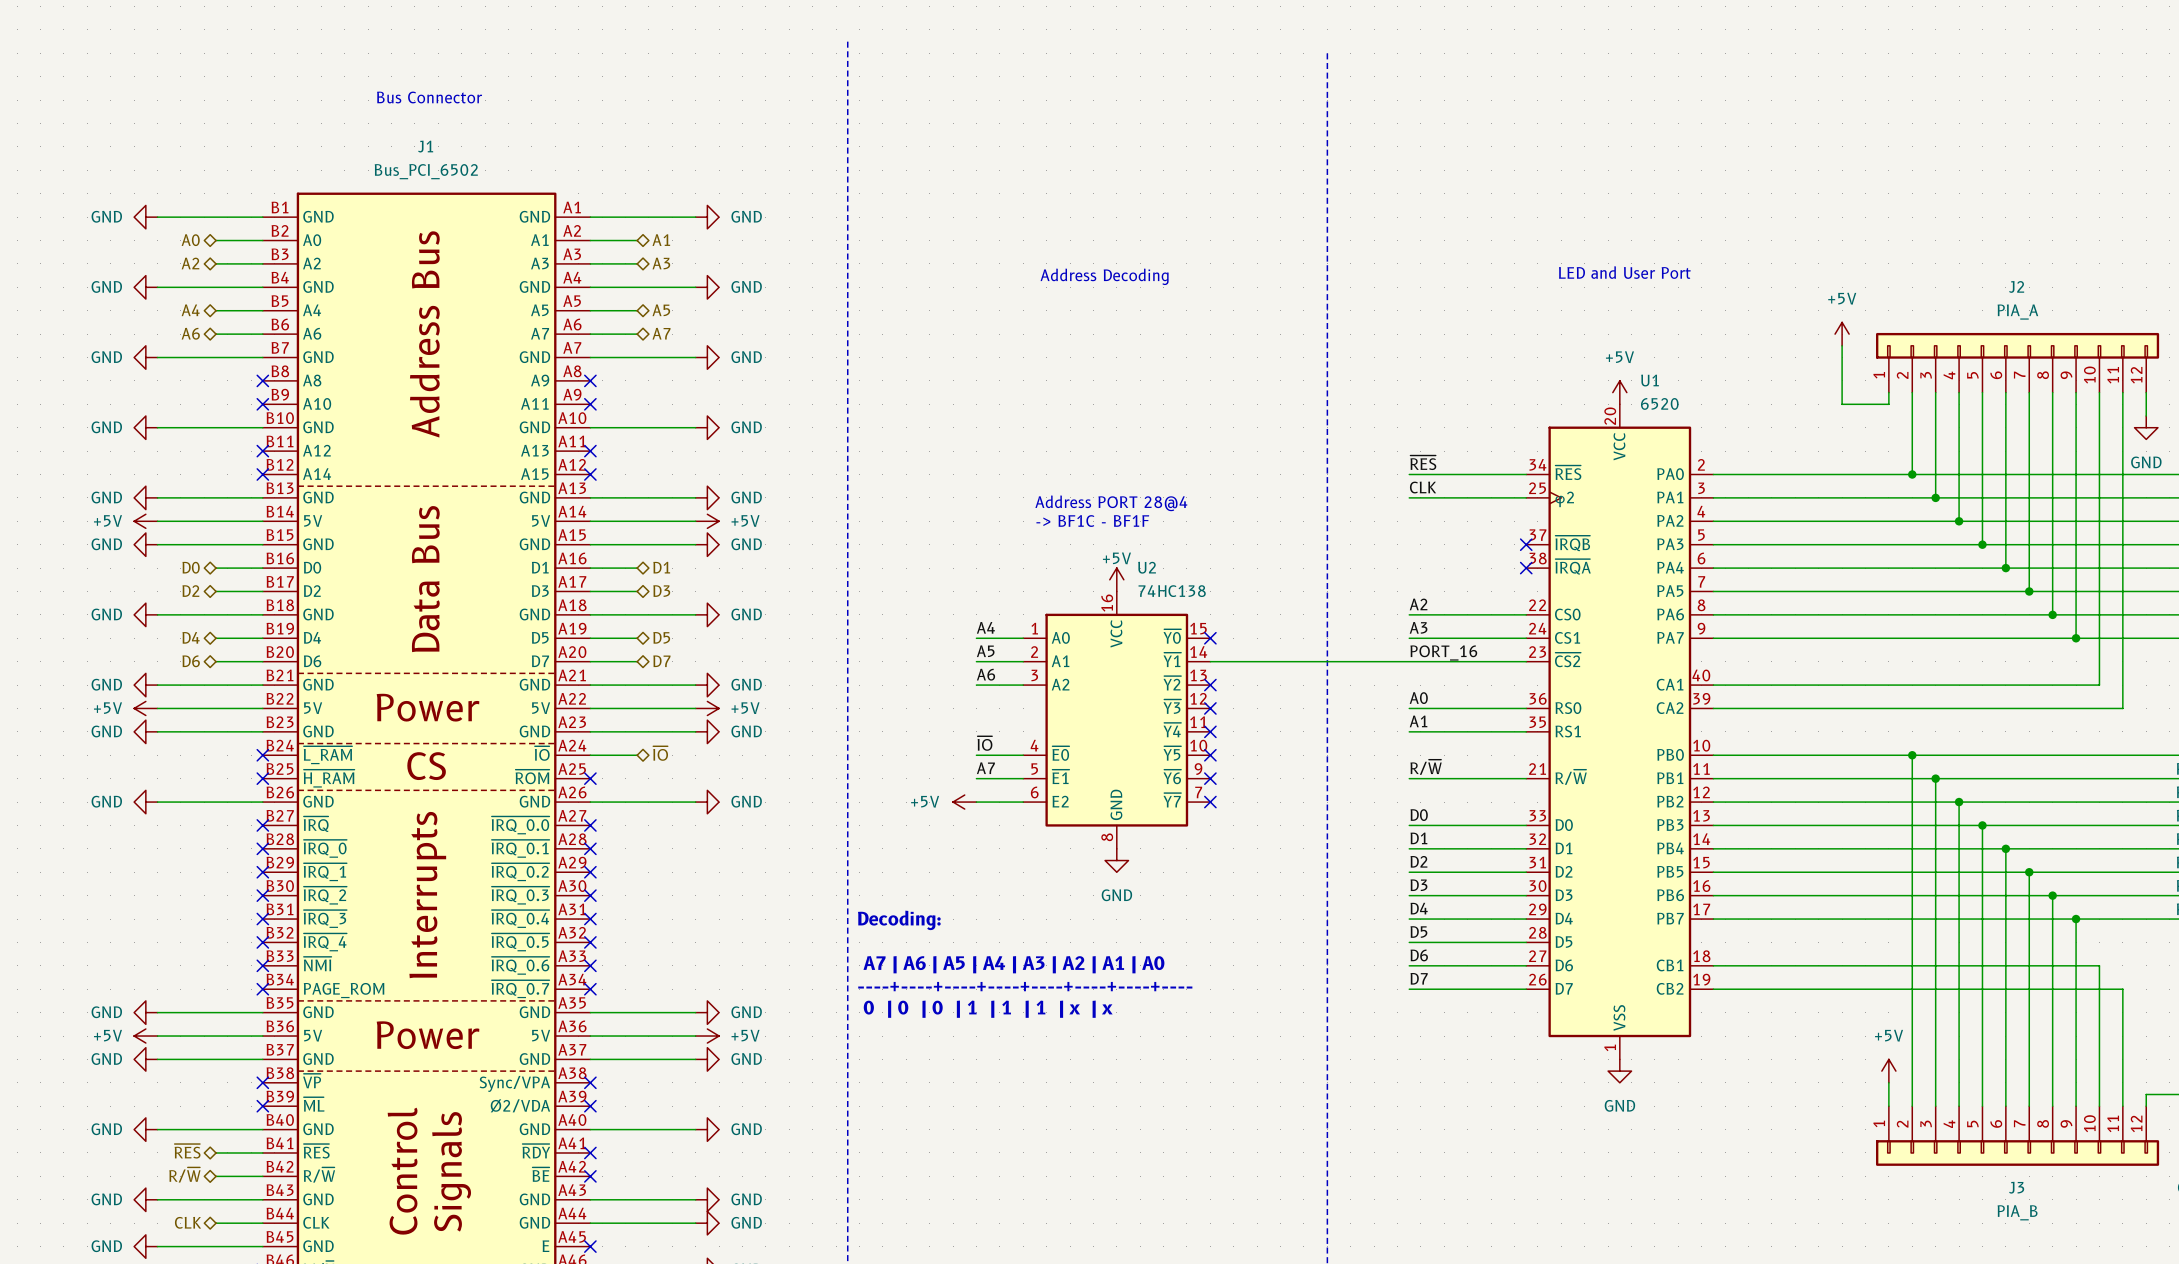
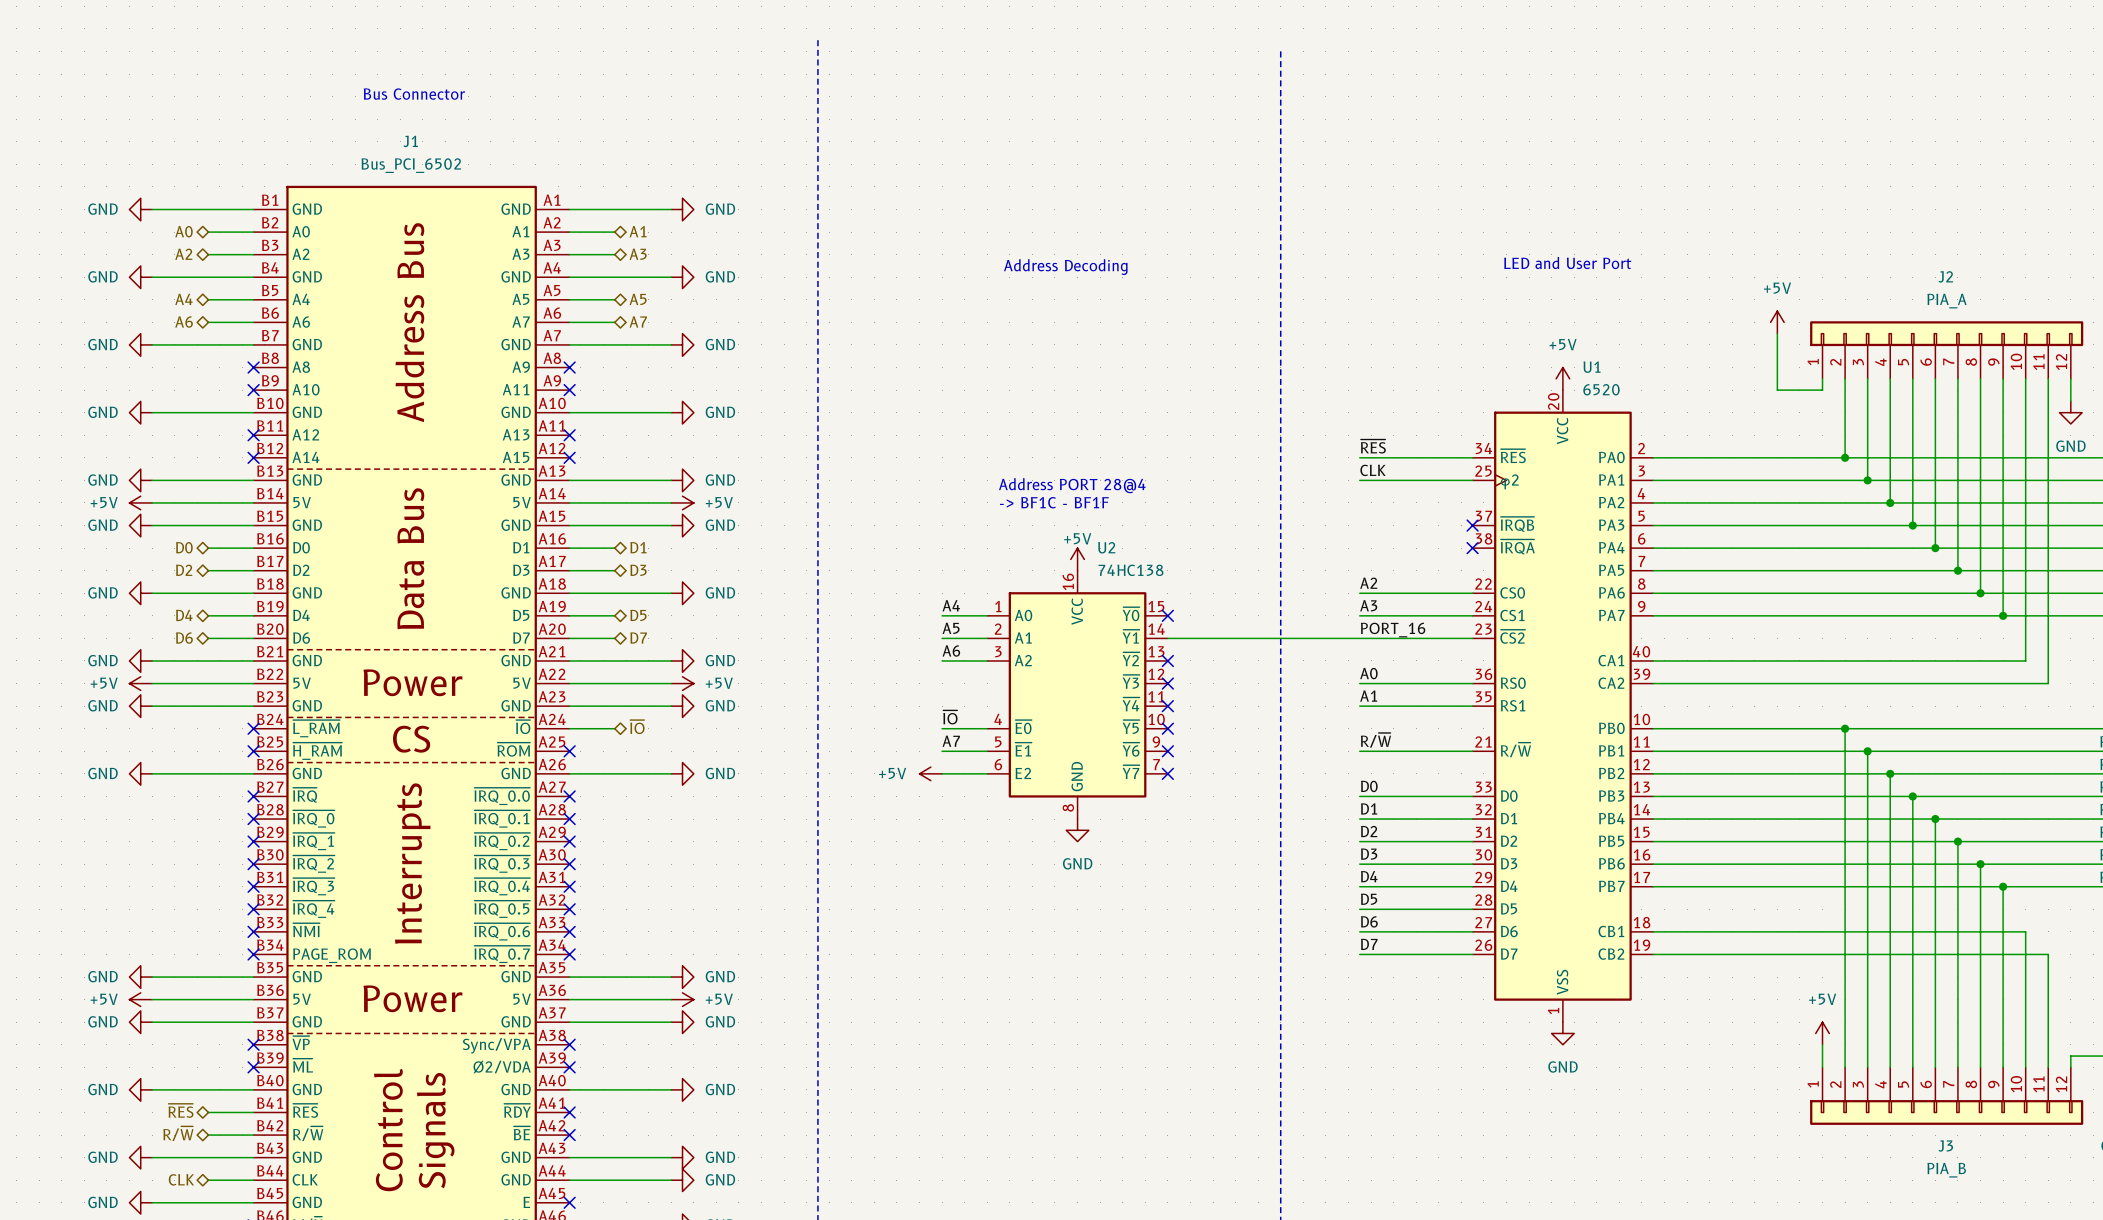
text: Decoding: (899, 920) -> none
text: A7 | A6 | A5 | A4 | A3 | A2 | A1 | A0 (1013, 964) -> none
text: ----+----+----+----+----+----+----+---- (1025, 986) -> none
text: 0 | 0 | 0 | 1 | 1 | 1 | x | x (988, 1009) -> none

